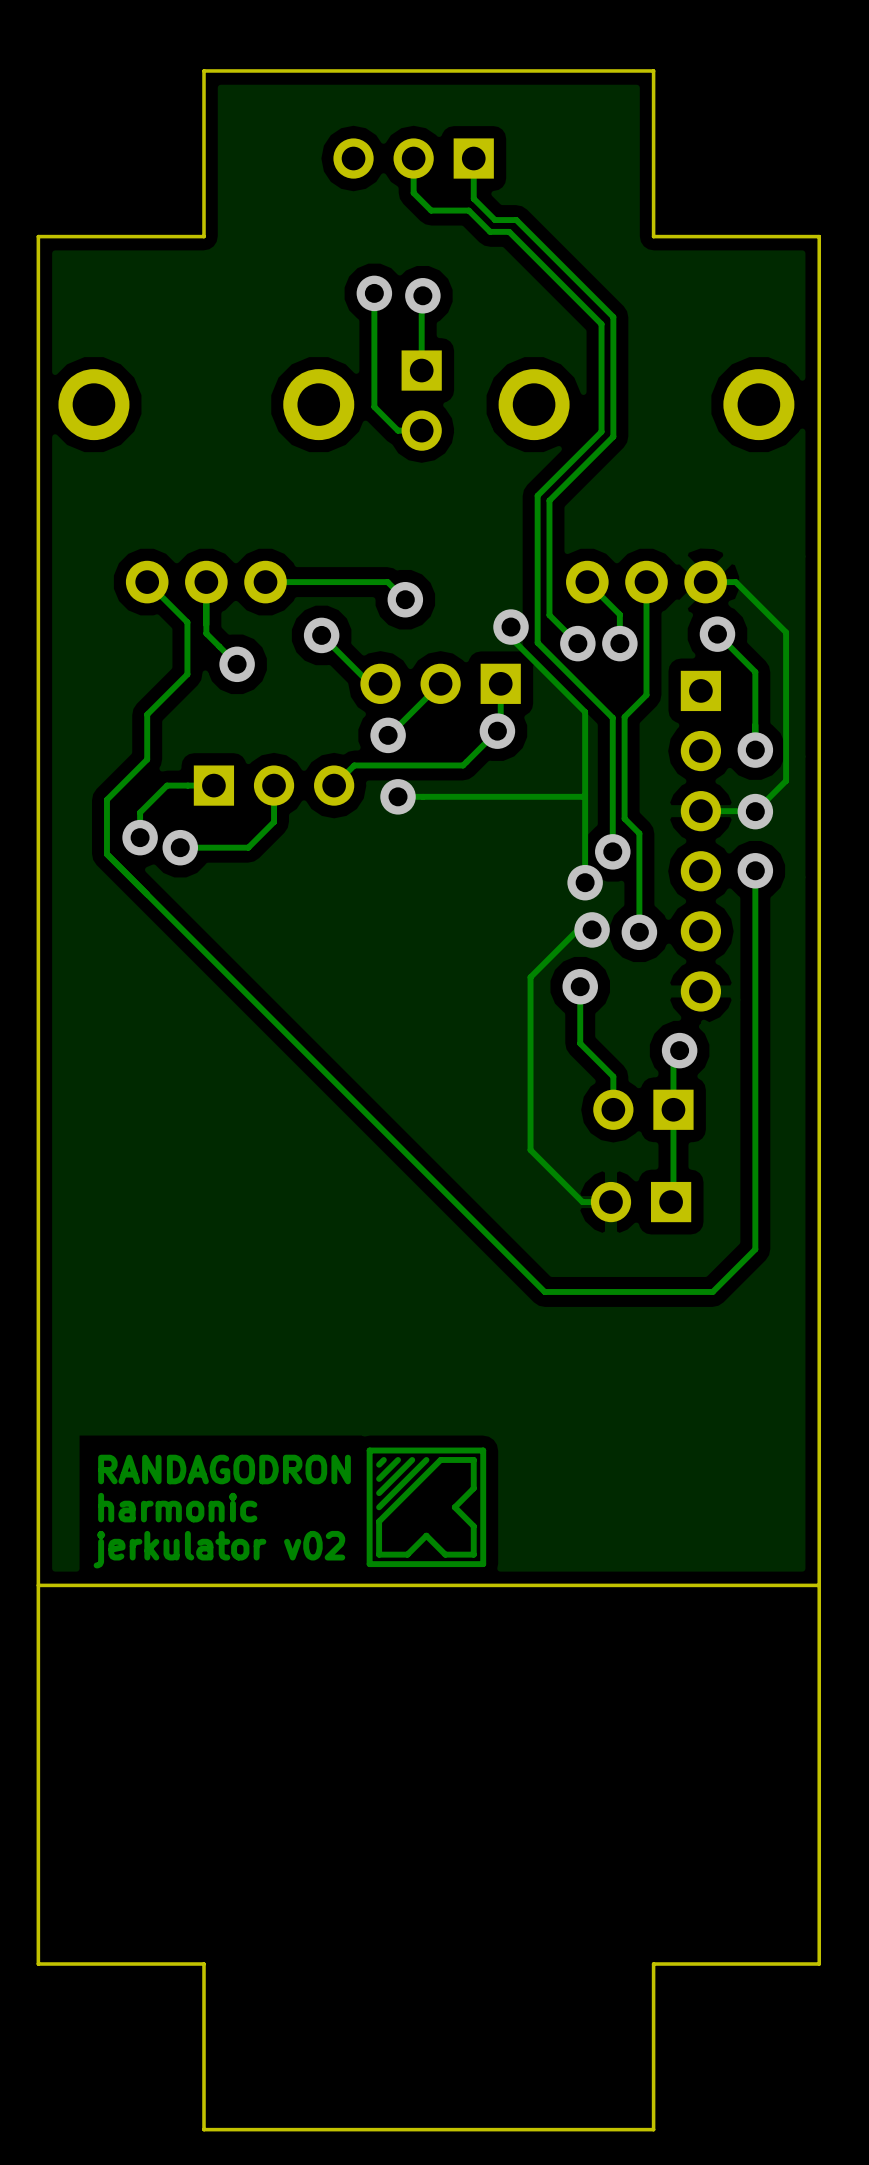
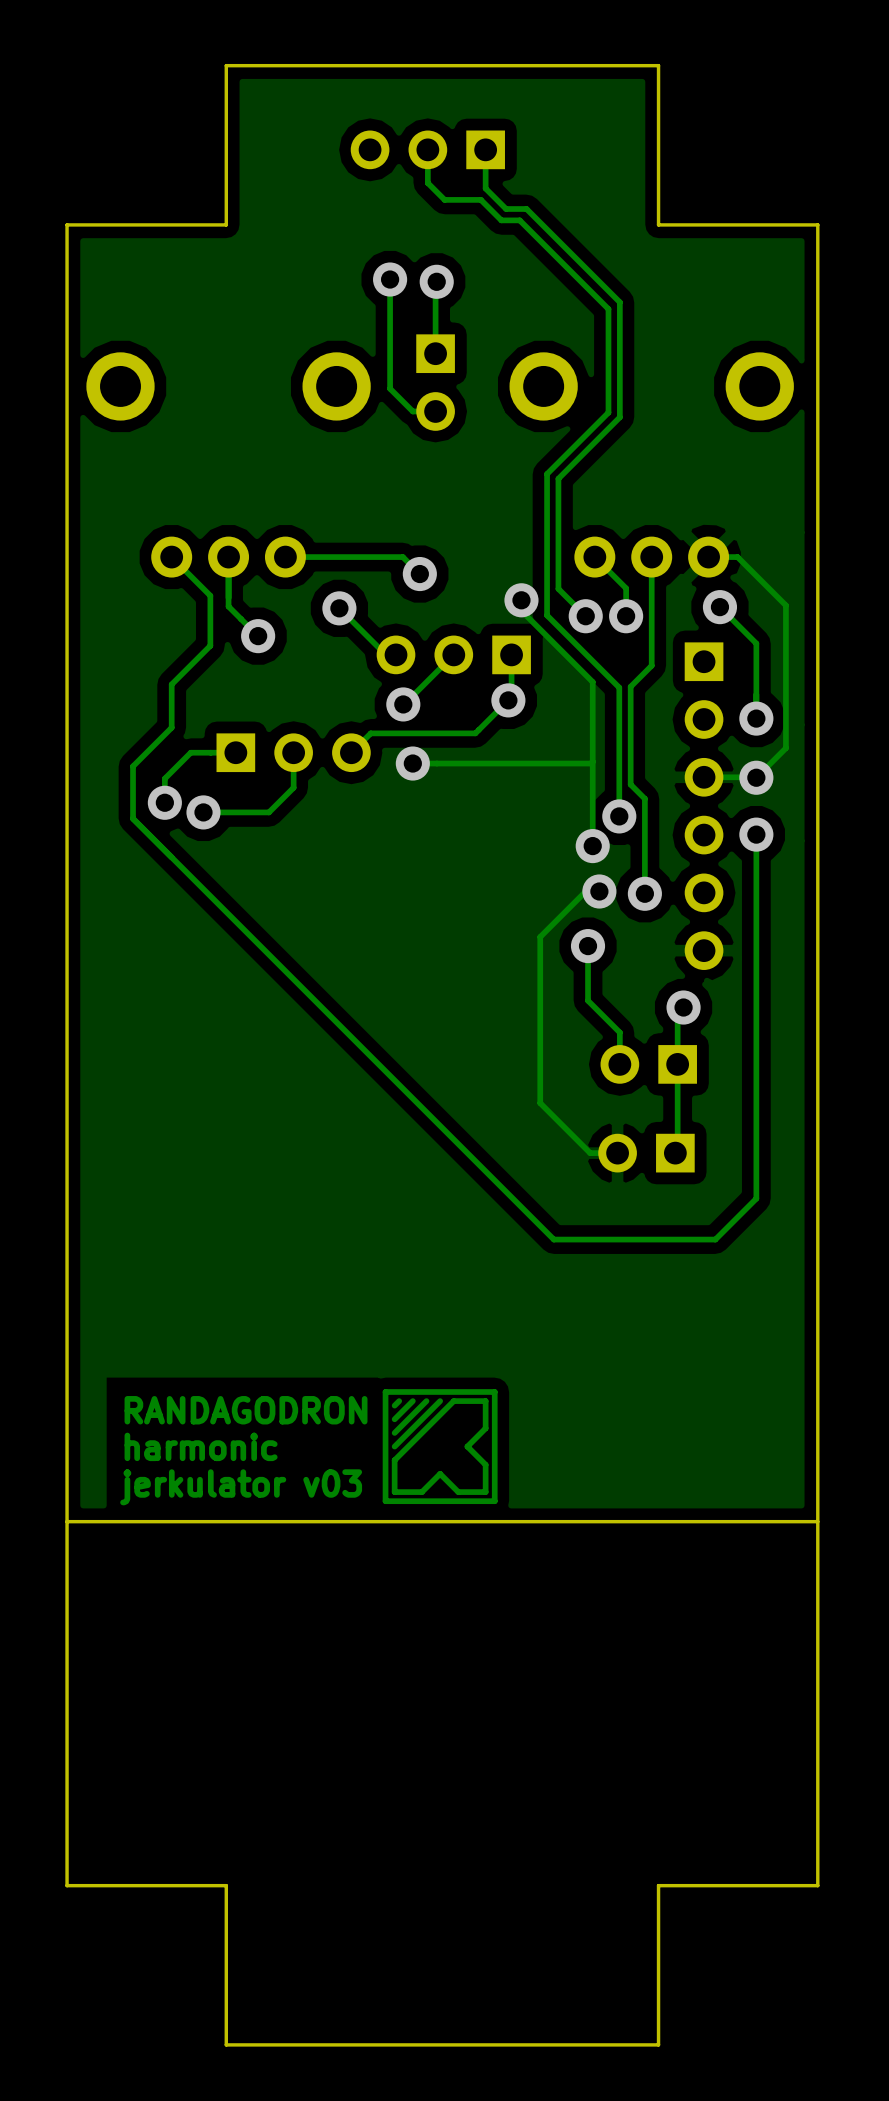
text: jerkulator v02 (219, 1549) -> jerkulator v03 (241, 1487)

